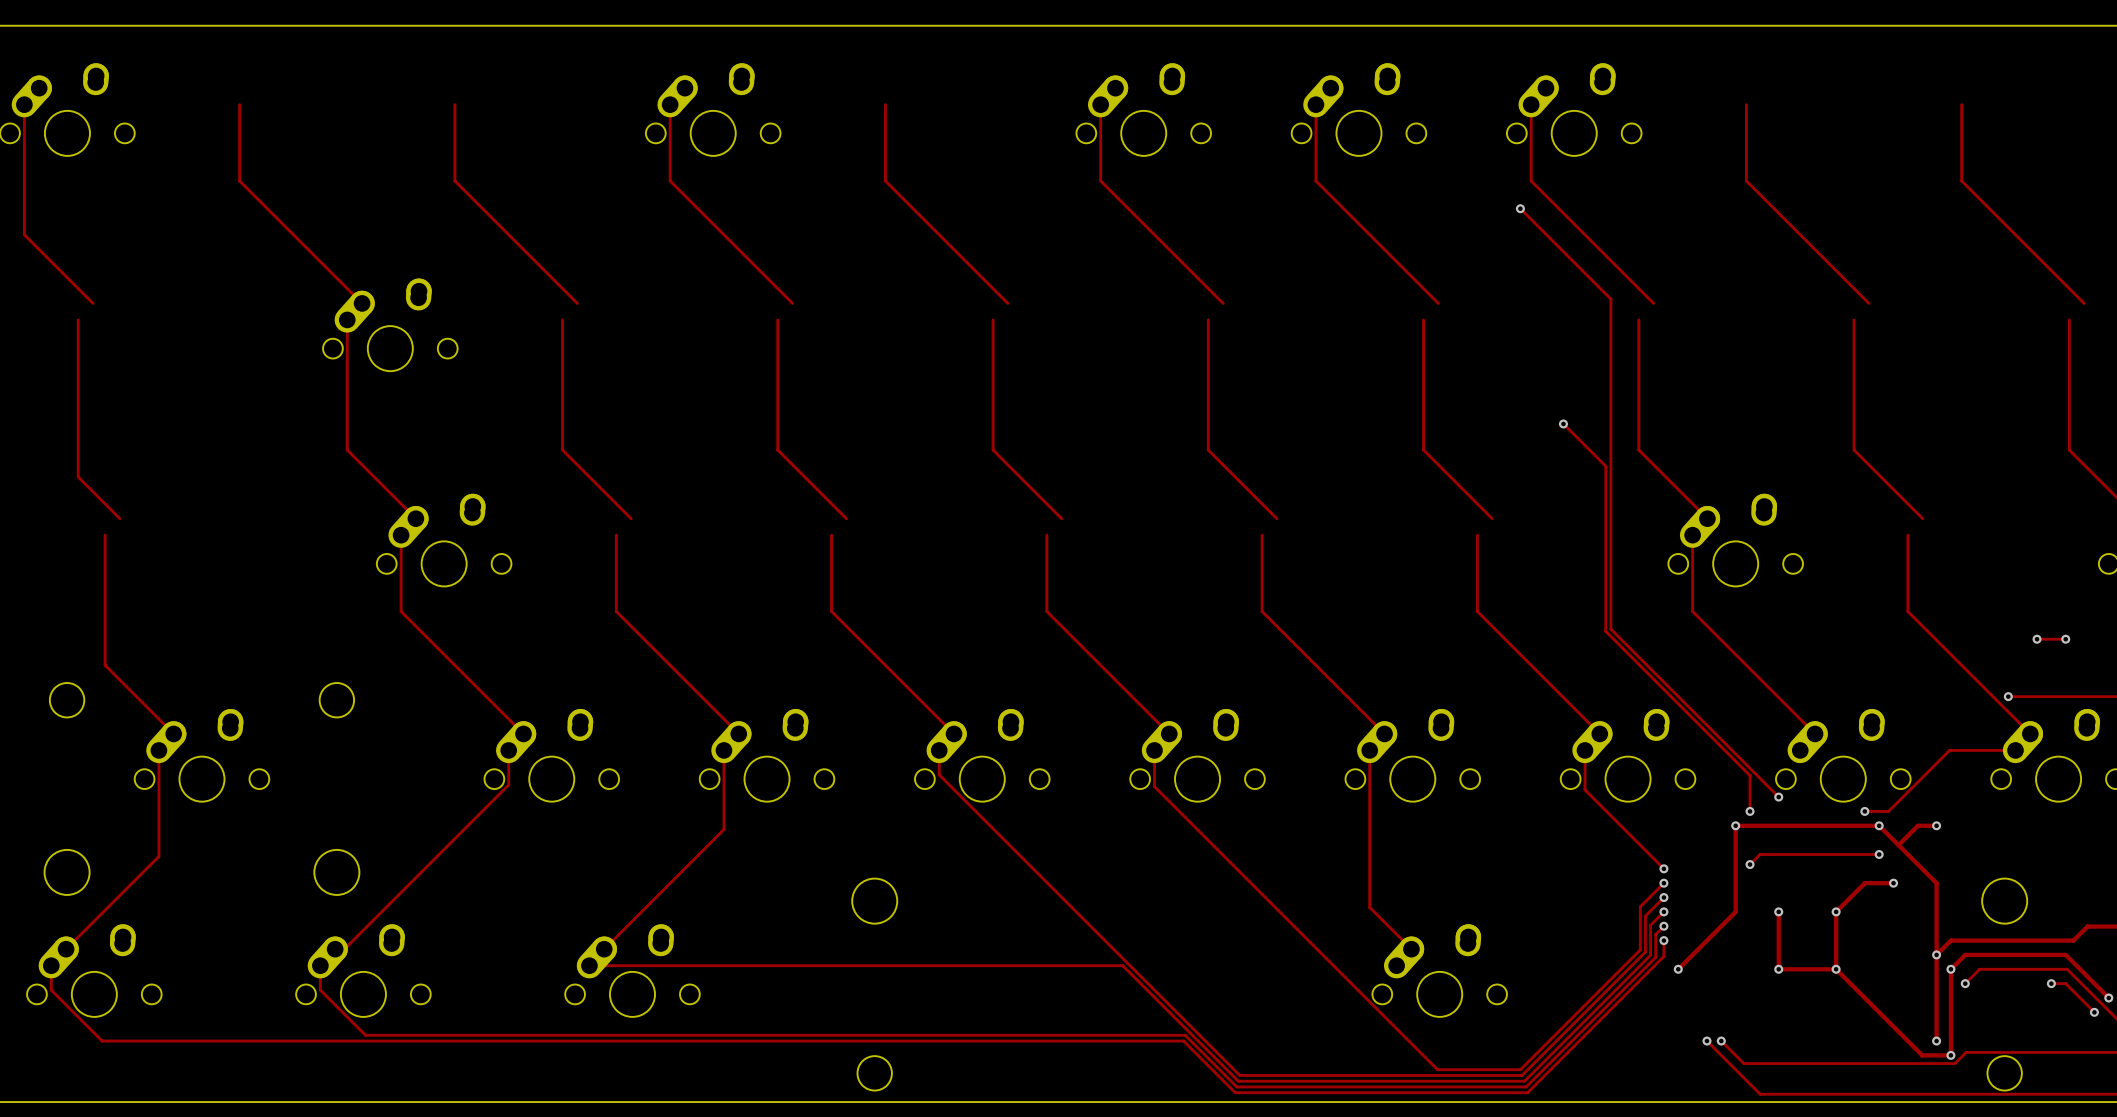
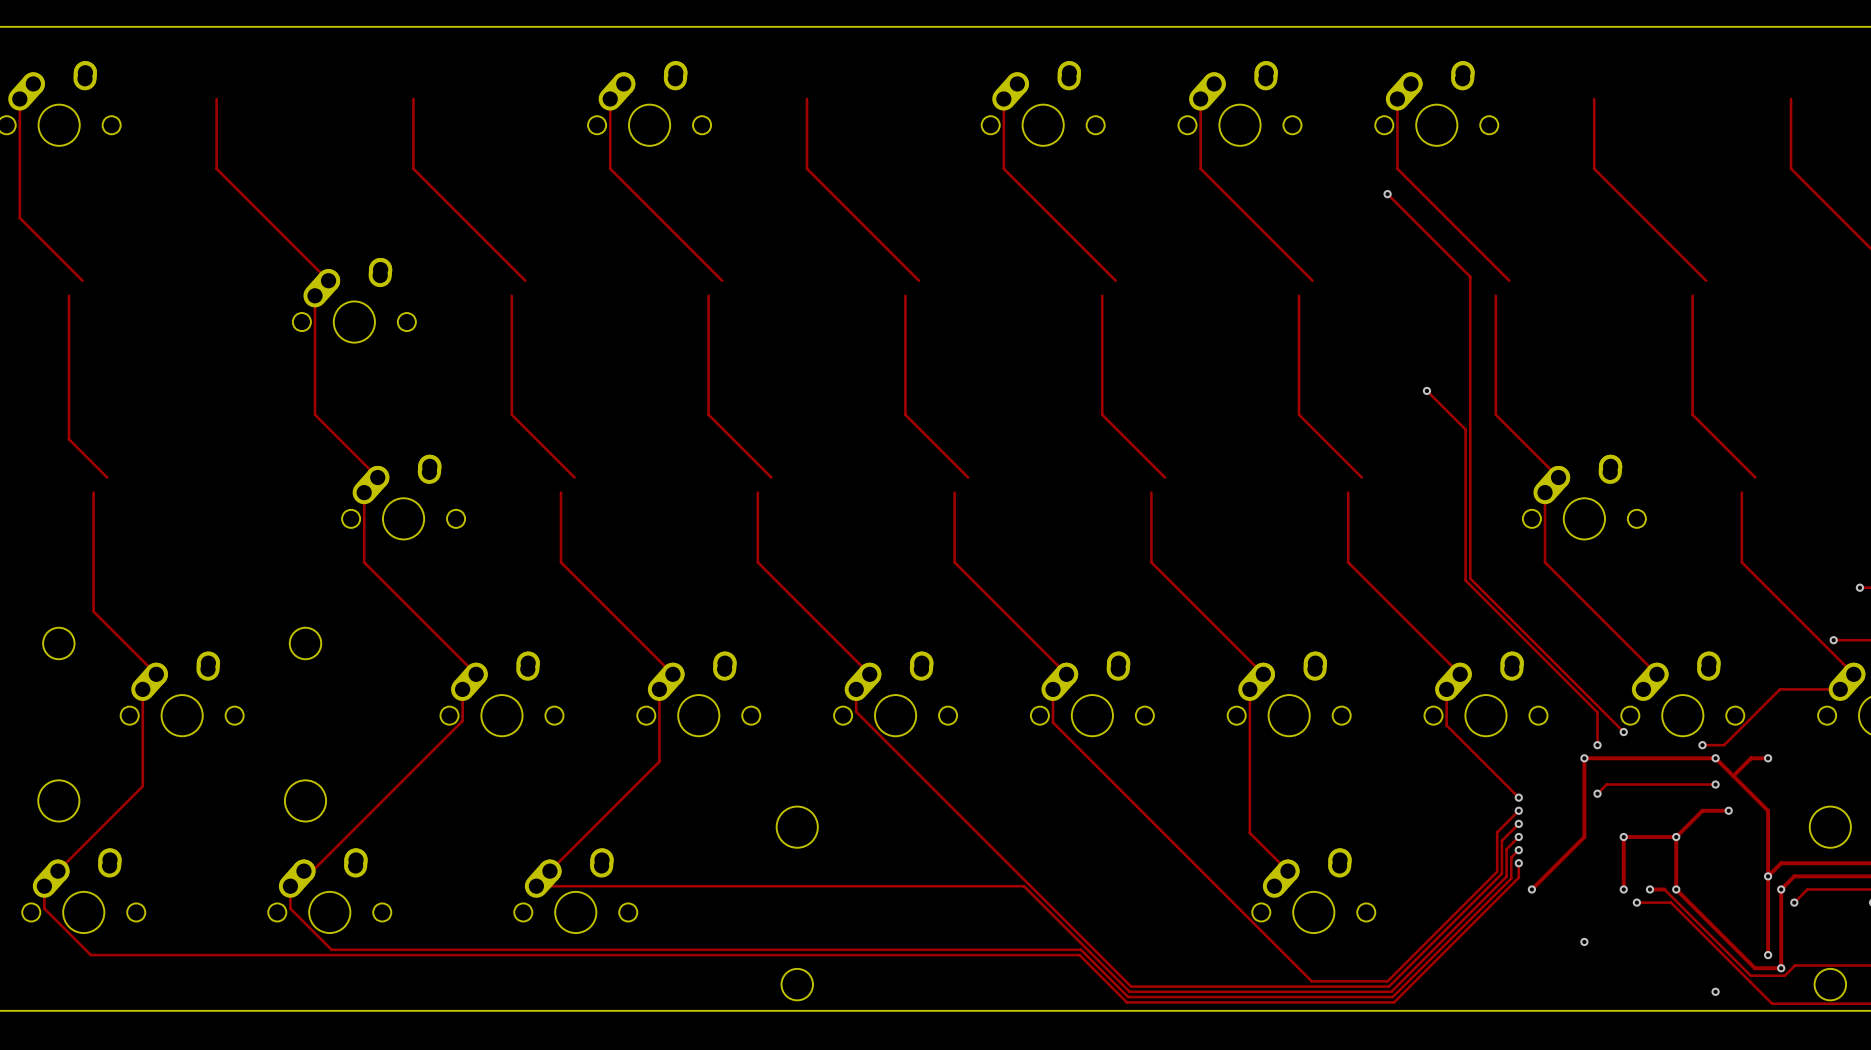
track: none -> (1623, 837) (1676, 837)
track: (1778, 969) (1807, 969) -> none
via: none -> (1649, 889)
track: (1823, 969) (1836, 969) -> (1664, 889) (1750, 975)
via: none -> (1636, 902)
via: none -> (1584, 941)
track: (1706, 1041) (1760, 1094) (1940, 1094) -> (1636, 902) (1670, 902) (1772, 1003)
via: (1706, 1041) -> none
track: (1721, 1041) (1743, 1063) (1917, 1063) -> none
via: (1721, 1041) -> none
via: none -> (1715, 991)

